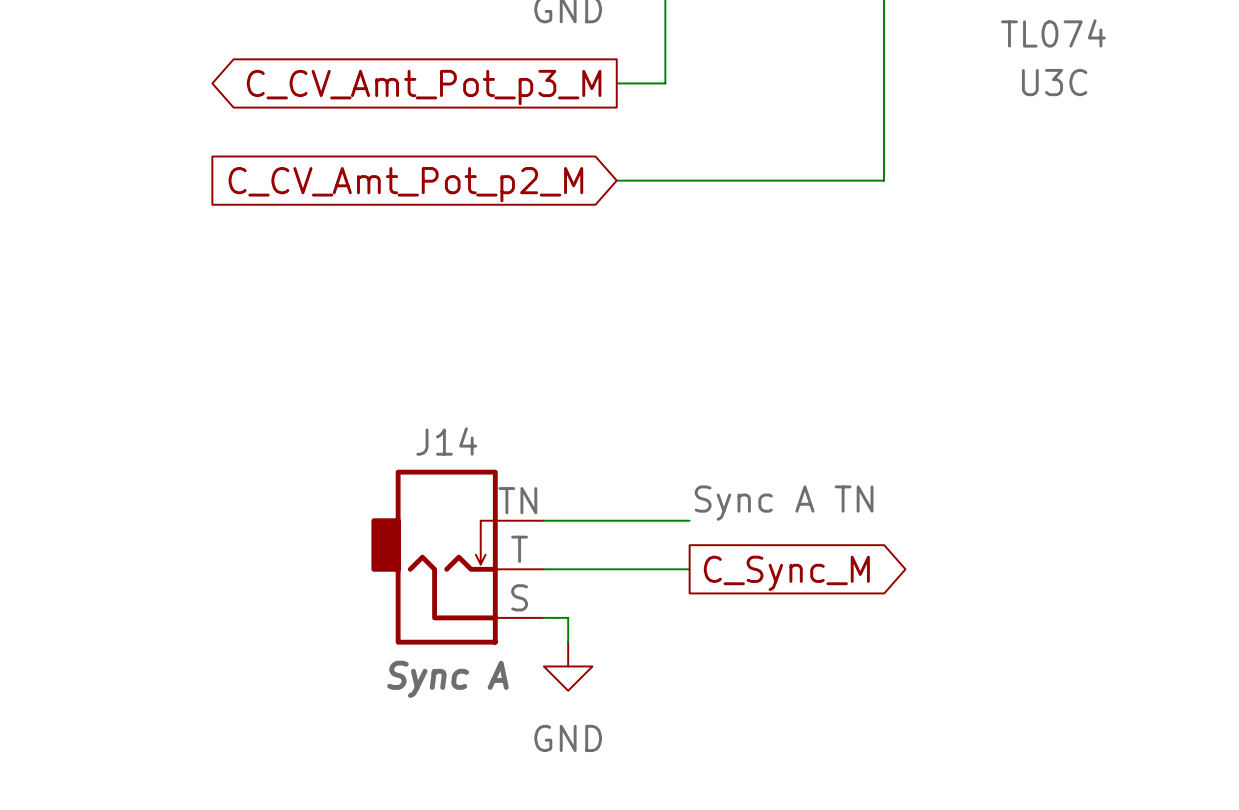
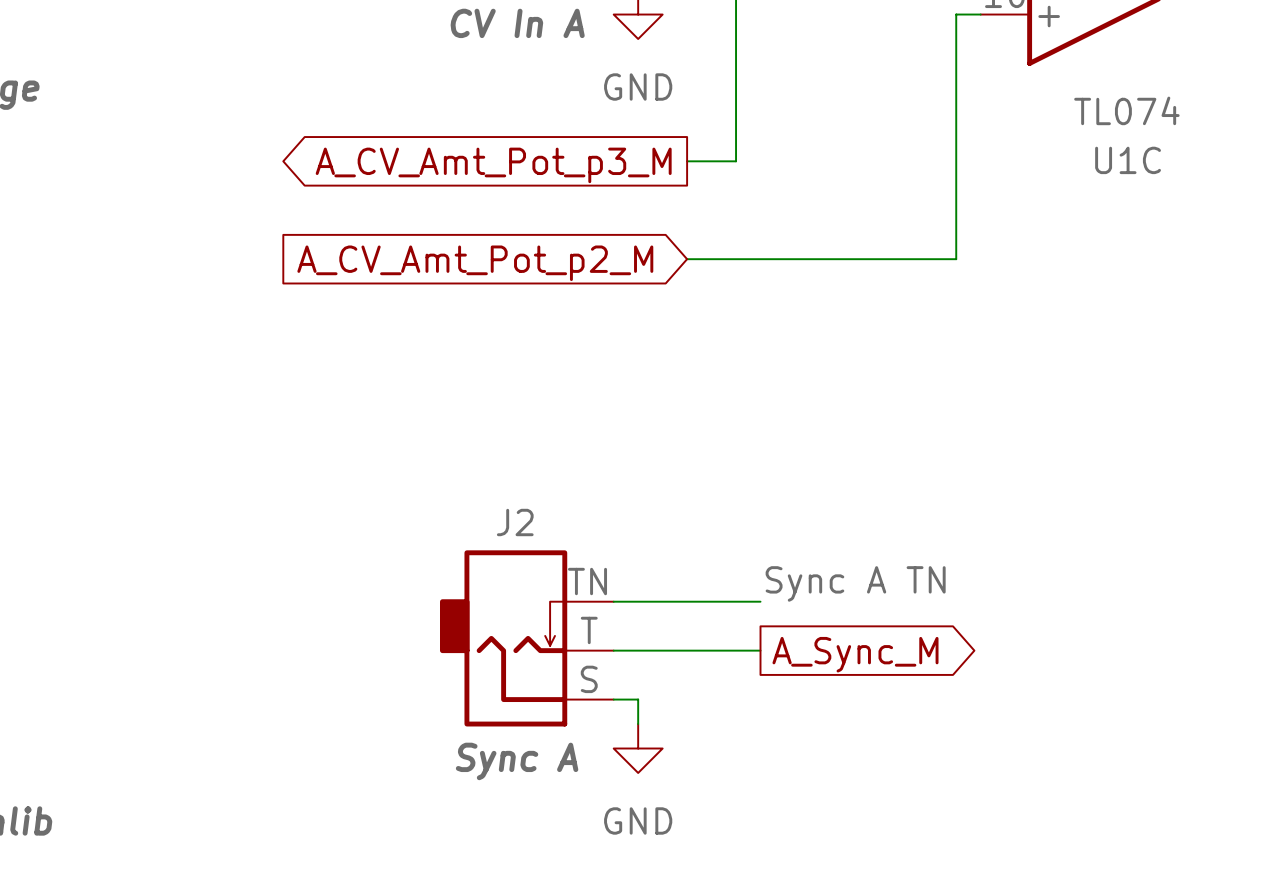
U3C name: U3C (1054, 82) -> U1C (1128, 160)
global label: C_CV_Amt_Pot_p3_M (424, 87) -> A_CV_Amt_Pot_p3_M (493, 165)
global label: C_CV_Amt_Pot_p2_M (405, 184) -> A_CV_Amt_Pot_p2_M (475, 263)
J14 name: J14 (446, 441) -> J2 (515, 522)
global label: C_Sync_M (786, 573) -> A_Sync_M (855, 654)

